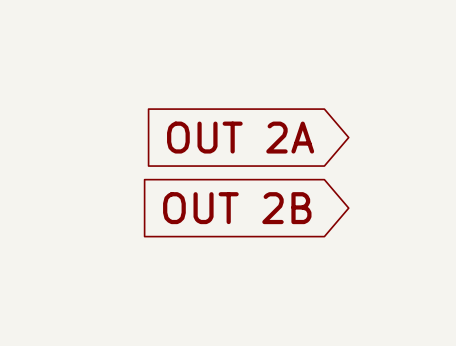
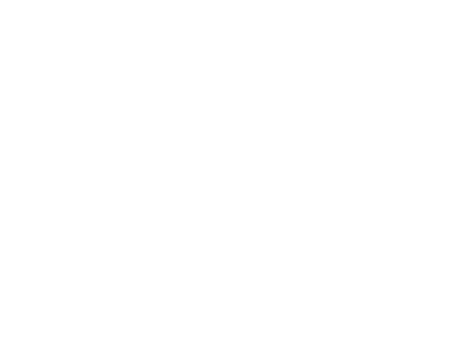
global label: OUT 2A (240, 137) -> none
global label: OUT 2B (237, 208) -> none

